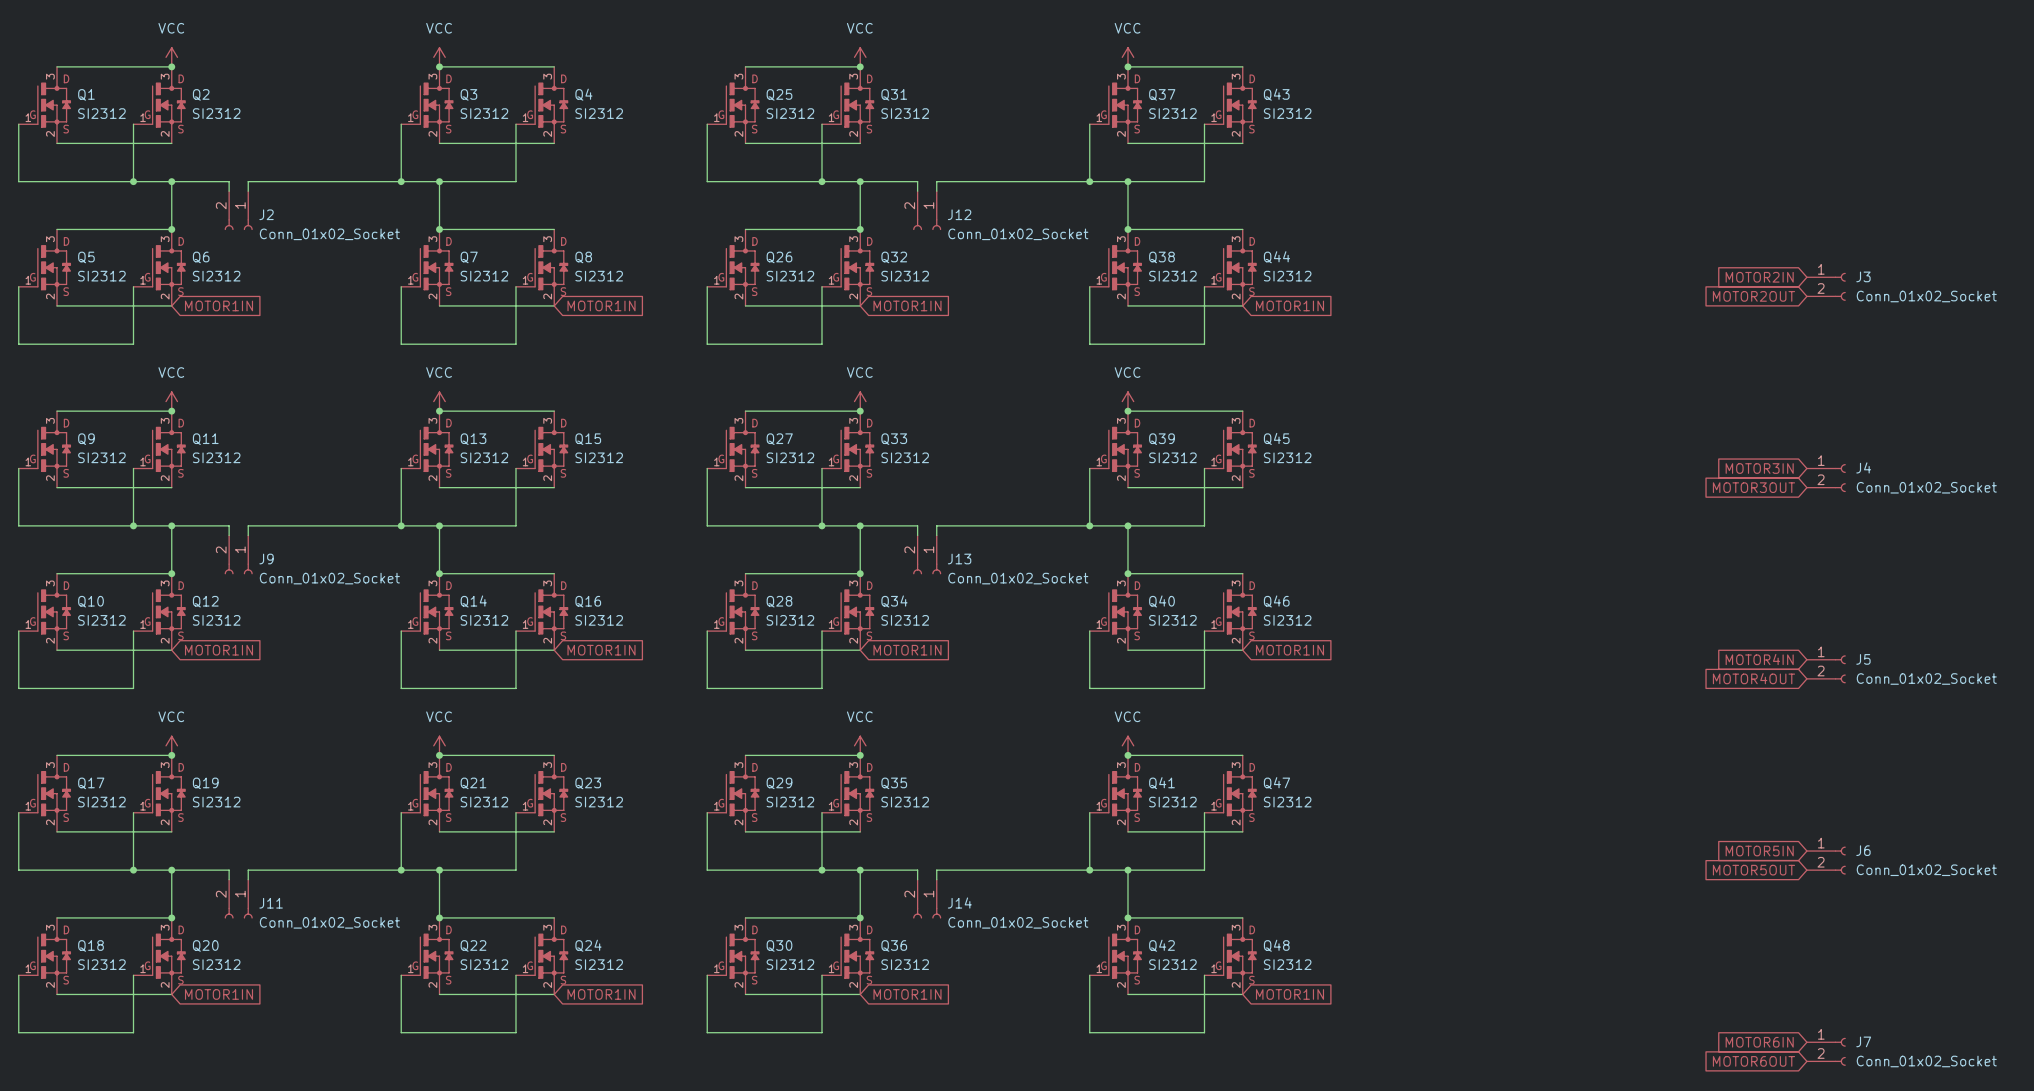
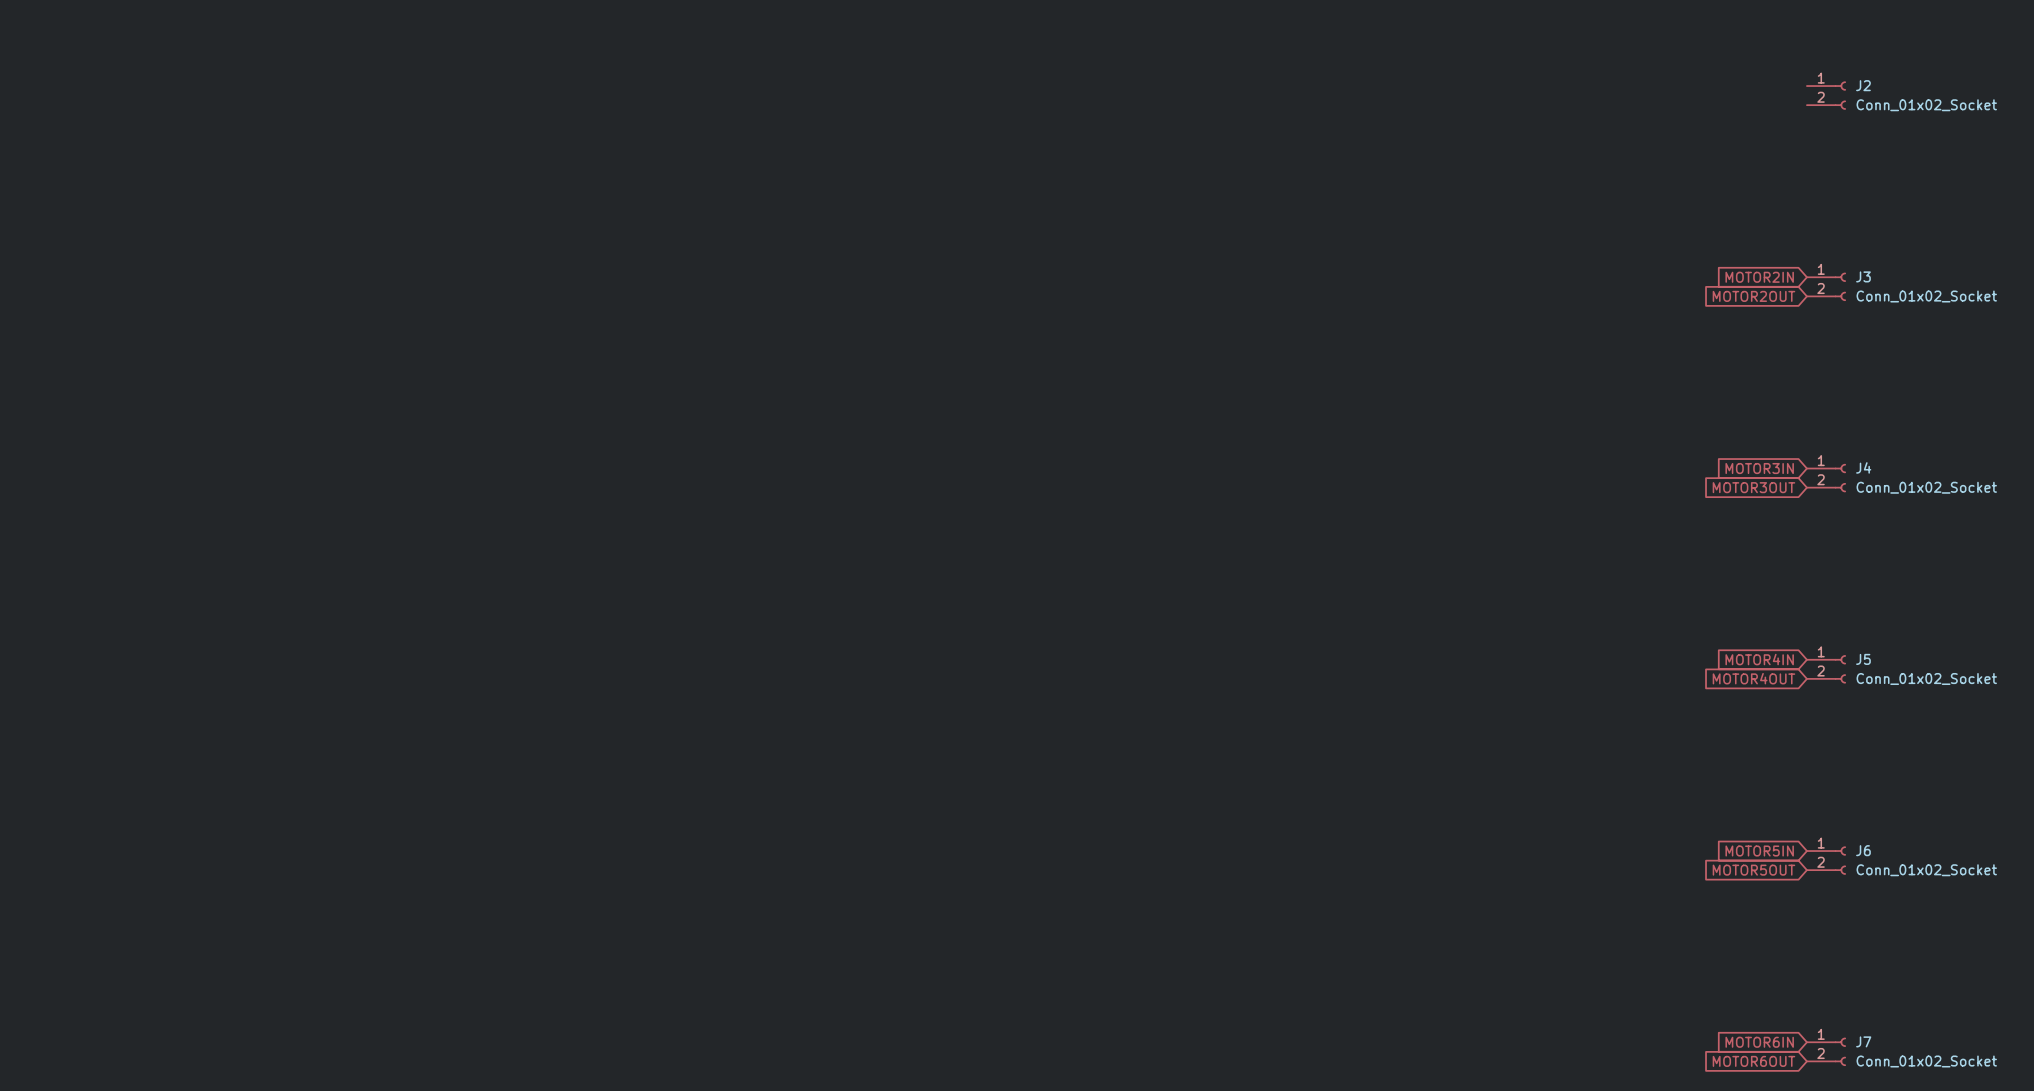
power symbol: VCC (171, 57) -> none
power symbol: VCC (439, 57) -> none
power symbol: VCC (860, 57) -> none
power symbol: VCC (1127, 57) -> none
wire: (57, 66) (171, 66) -> none
junction: (171, 66) -> none
wire: (439, 66) (554, 66) -> none
junction: (439, 66) -> none
wire: (745, 66) (860, 66) -> none
junction: (860, 66) -> none
wire: (1127, 66) (1242, 66) -> none
junction: (1127, 66) -> none
Q1: SI2312 (44, 105) -> none
Q2: SI2312 (159, 105) -> none
Q3: SI2312 (427, 105) -> none
Q4: SI2312 (542, 105) -> none
Q25: SI2312 (733, 105) -> none
Q31: SI2312 (848, 105) -> none
Q37: SI2312 (1115, 105) -> none
Q43: SI2312 (1230, 105) -> none
wire: (18, 124) (18, 181) (229, 181) (229, 191) -> none
wire: (133, 124) (133, 181) -> none
wire: (401, 124) (401, 181) -> none
wire: (515, 124) (515, 181) (248, 181) (248, 191) -> none
wire: (707, 124) (707, 181) (917, 181) (917, 191) -> none
wire: (821, 124) (821, 181) -> none
wire: (1089, 124) (1089, 181) -> none
wire: (1204, 124) (1204, 181) (936, 181) (936, 191) -> none
wire: (57, 143) (171, 143) -> none
wire: (439, 143) (554, 143) -> none
wire: (745, 143) (860, 143) -> none
wire: (1127, 143) (1242, 143) -> none
junction: (133, 181) -> none
wire: (171, 181) (171, 229) (57, 229) -> none
junction: (171, 181) -> none
junction: (401, 181) -> none
wire: (439, 181) (439, 229) (554, 229) -> none
junction: (439, 181) -> none
junction: (821, 181) -> none
wire: (860, 181) (860, 229) (745, 229) -> none
junction: (860, 181) -> none
junction: (1089, 181) -> none
wire: (1127, 181) (1127, 229) (1242, 229) -> none
junction: (1127, 181) -> none
J2 position: (238, 210) -> (1826, 95)
J12: Conn_01x02_Socket (927, 210) -> none
J2 name position: J2 (266, 214) -> J2 (1863, 85)
J2 rotation: 0° (238, 224) -> 90° counterclockwise (1840, 95)
junction: (171, 229) -> none
junction: (439, 229) -> none
junction: (860, 229) -> none
junction: (1127, 229) -> none
J2 value position: Conn_01x02_Socket (329, 234) -> Conn_01x02_Socket (1926, 105)
Q5: SI2312 (44, 267) -> none
Q6: SI2312 (159, 267) -> none
Q7: SI2312 (427, 267) -> none
Q8: SI2312 (542, 267) -> none
Q26: SI2312 (733, 267) -> none
Q32: SI2312 (848, 267) -> none
Q38: SI2312 (1115, 267) -> none
Q44: SI2312 (1230, 267) -> none
wire: (18, 286) (18, 344) (133, 344) (133, 286) -> none
wire: (401, 286) (401, 344) (515, 344) (515, 286) -> none
wire: (707, 286) (707, 344) (821, 344) (821, 286) -> none
wire: (1089, 286) (1089, 344) (1204, 344) (1204, 286) -> none
wire: (57, 305) (171, 305) -> none
global label: MOTOR1IN (219, 305) -> none
wire: (439, 305) (554, 305) -> none
global label: MOTOR1IN (601, 305) -> none
wire: (745, 305) (860, 305) -> none
global label: MOTOR1IN (907, 305) -> none
wire: (1127, 305) (1242, 305) -> none
global label: MOTOR1IN (1290, 305) -> none
power symbol: VCC (171, 401) -> none
power symbol: VCC (439, 401) -> none
power symbol: VCC (860, 401) -> none
power symbol: VCC (1127, 401) -> none
wire: (57, 411) (171, 411) -> none
junction: (171, 411) -> none
wire: (439, 411) (554, 411) -> none
junction: (439, 411) -> none
wire: (745, 411) (860, 411) -> none
junction: (860, 411) -> none
wire: (1127, 411) (1242, 411) -> none
junction: (1127, 411) -> none
Q9: SI2312 (44, 449) -> none
Q11: SI2312 (159, 449) -> none
Q13: SI2312 (427, 449) -> none
Q15: SI2312 (542, 449) -> none
Q27: SI2312 (733, 449) -> none
Q33: SI2312 (848, 449) -> none
Q39: SI2312 (1115, 449) -> none
Q45: SI2312 (1230, 449) -> none
wire: (18, 468) (18, 525) (229, 525) (229, 535) -> none
wire: (133, 468) (133, 525) -> none
wire: (401, 468) (401, 525) -> none
wire: (515, 468) (515, 525) (248, 525) (248, 535) -> none
wire: (707, 468) (707, 525) (917, 525) (917, 535) -> none
wire: (821, 468) (821, 525) -> none
wire: (1089, 468) (1089, 525) -> none
wire: (1204, 468) (1204, 525) (936, 525) (936, 535) -> none
wire: (57, 487) (171, 487) -> none
wire: (439, 487) (554, 487) -> none
wire: (745, 487) (860, 487) -> none
wire: (1127, 487) (1242, 487) -> none
junction: (133, 525) -> none
wire: (171, 525) (171, 573) (57, 573) -> none
junction: (171, 525) -> none
junction: (401, 525) -> none
wire: (439, 525) (439, 573) (554, 573) -> none
junction: (439, 525) -> none
junction: (821, 525) -> none
wire: (860, 525) (860, 573) (745, 573) -> none
junction: (860, 525) -> none
junction: (1089, 525) -> none
wire: (1127, 525) (1127, 573) (1242, 573) -> none
junction: (1127, 525) -> none
J9: Conn_01x02_Socket (238, 554) -> none
J13: Conn_01x02_Socket (927, 554) -> none
junction: (171, 573) -> none
junction: (439, 573) -> none
junction: (860, 573) -> none
junction: (1127, 573) -> none
Q10: SI2312 (44, 611) -> none
Q12: SI2312 (159, 611) -> none
Q14: SI2312 (427, 611) -> none
Q16: SI2312 (542, 611) -> none
Q28: SI2312 (733, 611) -> none
Q34: SI2312 (848, 611) -> none
Q40: SI2312 (1115, 611) -> none
Q46: SI2312 (1230, 611) -> none
wire: (18, 631) (18, 688) (133, 688) (133, 631) -> none
wire: (401, 631) (401, 688) (515, 688) (515, 631) -> none
wire: (707, 631) (707, 688) (821, 688) (821, 631) -> none
wire: (1089, 631) (1089, 688) (1204, 688) (1204, 631) -> none
wire: (57, 650) (171, 650) -> none
global label: MOTOR1IN (219, 650) -> none
wire: (439, 650) (554, 650) -> none
global label: MOTOR1IN (601, 650) -> none
wire: (745, 650) (860, 650) -> none
global label: MOTOR1IN (907, 650) -> none
wire: (1127, 650) (1242, 650) -> none
global label: MOTOR1IN (1290, 650) -> none
power symbol: VCC (171, 745) -> none
power symbol: VCC (439, 745) -> none
power symbol: VCC (860, 745) -> none
power symbol: VCC (1127, 745) -> none
wire: (57, 755) (171, 755) -> none
junction: (171, 755) -> none
wire: (439, 755) (554, 755) -> none
junction: (439, 755) -> none
wire: (745, 755) (860, 755) -> none
junction: (860, 755) -> none
wire: (1127, 755) (1242, 755) -> none
junction: (1127, 755) -> none
Q17: SI2312 (44, 793) -> none
Q19: SI2312 (159, 793) -> none
Q21: SI2312 (427, 793) -> none
Q23: SI2312 (542, 793) -> none
Q29: SI2312 (733, 793) -> none
Q35: SI2312 (848, 793) -> none
Q41: SI2312 (1115, 793) -> none
Q47: SI2312 (1230, 793) -> none
wire: (18, 812) (18, 870) (229, 870) (229, 879) -> none
wire: (133, 812) (133, 870) -> none
wire: (401, 812) (401, 870) -> none
wire: (515, 812) (515, 870) (248, 870) (248, 879) -> none
wire: (707, 812) (707, 870) (917, 870) (917, 879) -> none
wire: (821, 812) (821, 870) -> none
wire: (1089, 812) (1089, 870) -> none
wire: (1204, 812) (1204, 870) (936, 870) (936, 879) -> none
wire: (57, 831) (171, 831) -> none
wire: (439, 831) (554, 831) -> none
wire: (745, 831) (860, 831) -> none
wire: (1127, 831) (1242, 831) -> none
junction: (133, 870) -> none
wire: (171, 870) (171, 917) (57, 917) -> none
junction: (171, 870) -> none
junction: (401, 870) -> none
wire: (439, 870) (439, 917) (554, 917) -> none
junction: (439, 870) -> none
junction: (821, 870) -> none
wire: (860, 870) (860, 917) (745, 917) -> none
junction: (860, 870) -> none
junction: (1089, 870) -> none
wire: (1127, 870) (1127, 917) (1242, 917) -> none
junction: (1127, 870) -> none
J11: Conn_01x02_Socket (238, 899) -> none
J14: Conn_01x02_Socket (927, 899) -> none
junction: (171, 917) -> none
junction: (439, 917) -> none
junction: (860, 917) -> none
junction: (1127, 917) -> none
Q18: SI2312 (44, 956) -> none
Q20: SI2312 (159, 956) -> none
Q22: SI2312 (427, 956) -> none
Q24: SI2312 (542, 956) -> none
Q30: SI2312 (733, 956) -> none
Q36: SI2312 (848, 956) -> none
Q42: SI2312 (1115, 956) -> none
Q48: SI2312 (1230, 956) -> none
wire: (18, 975) (18, 1032) (133, 1032) (133, 975) -> none
wire: (401, 975) (401, 1032) (515, 1032) (515, 975) -> none
wire: (707, 975) (707, 1032) (821, 1032) (821, 975) -> none
wire: (1089, 975) (1089, 1032) (1204, 1032) (1204, 975) -> none
wire: (57, 994) (171, 994) -> none
global label: MOTOR1IN (219, 994) -> none
wire: (439, 994) (554, 994) -> none
global label: MOTOR1IN (601, 994) -> none
wire: (745, 994) (860, 994) -> none
global label: MOTOR1IN (907, 994) -> none
wire: (1127, 994) (1242, 994) -> none
global label: MOTOR1IN (1290, 994) -> none

